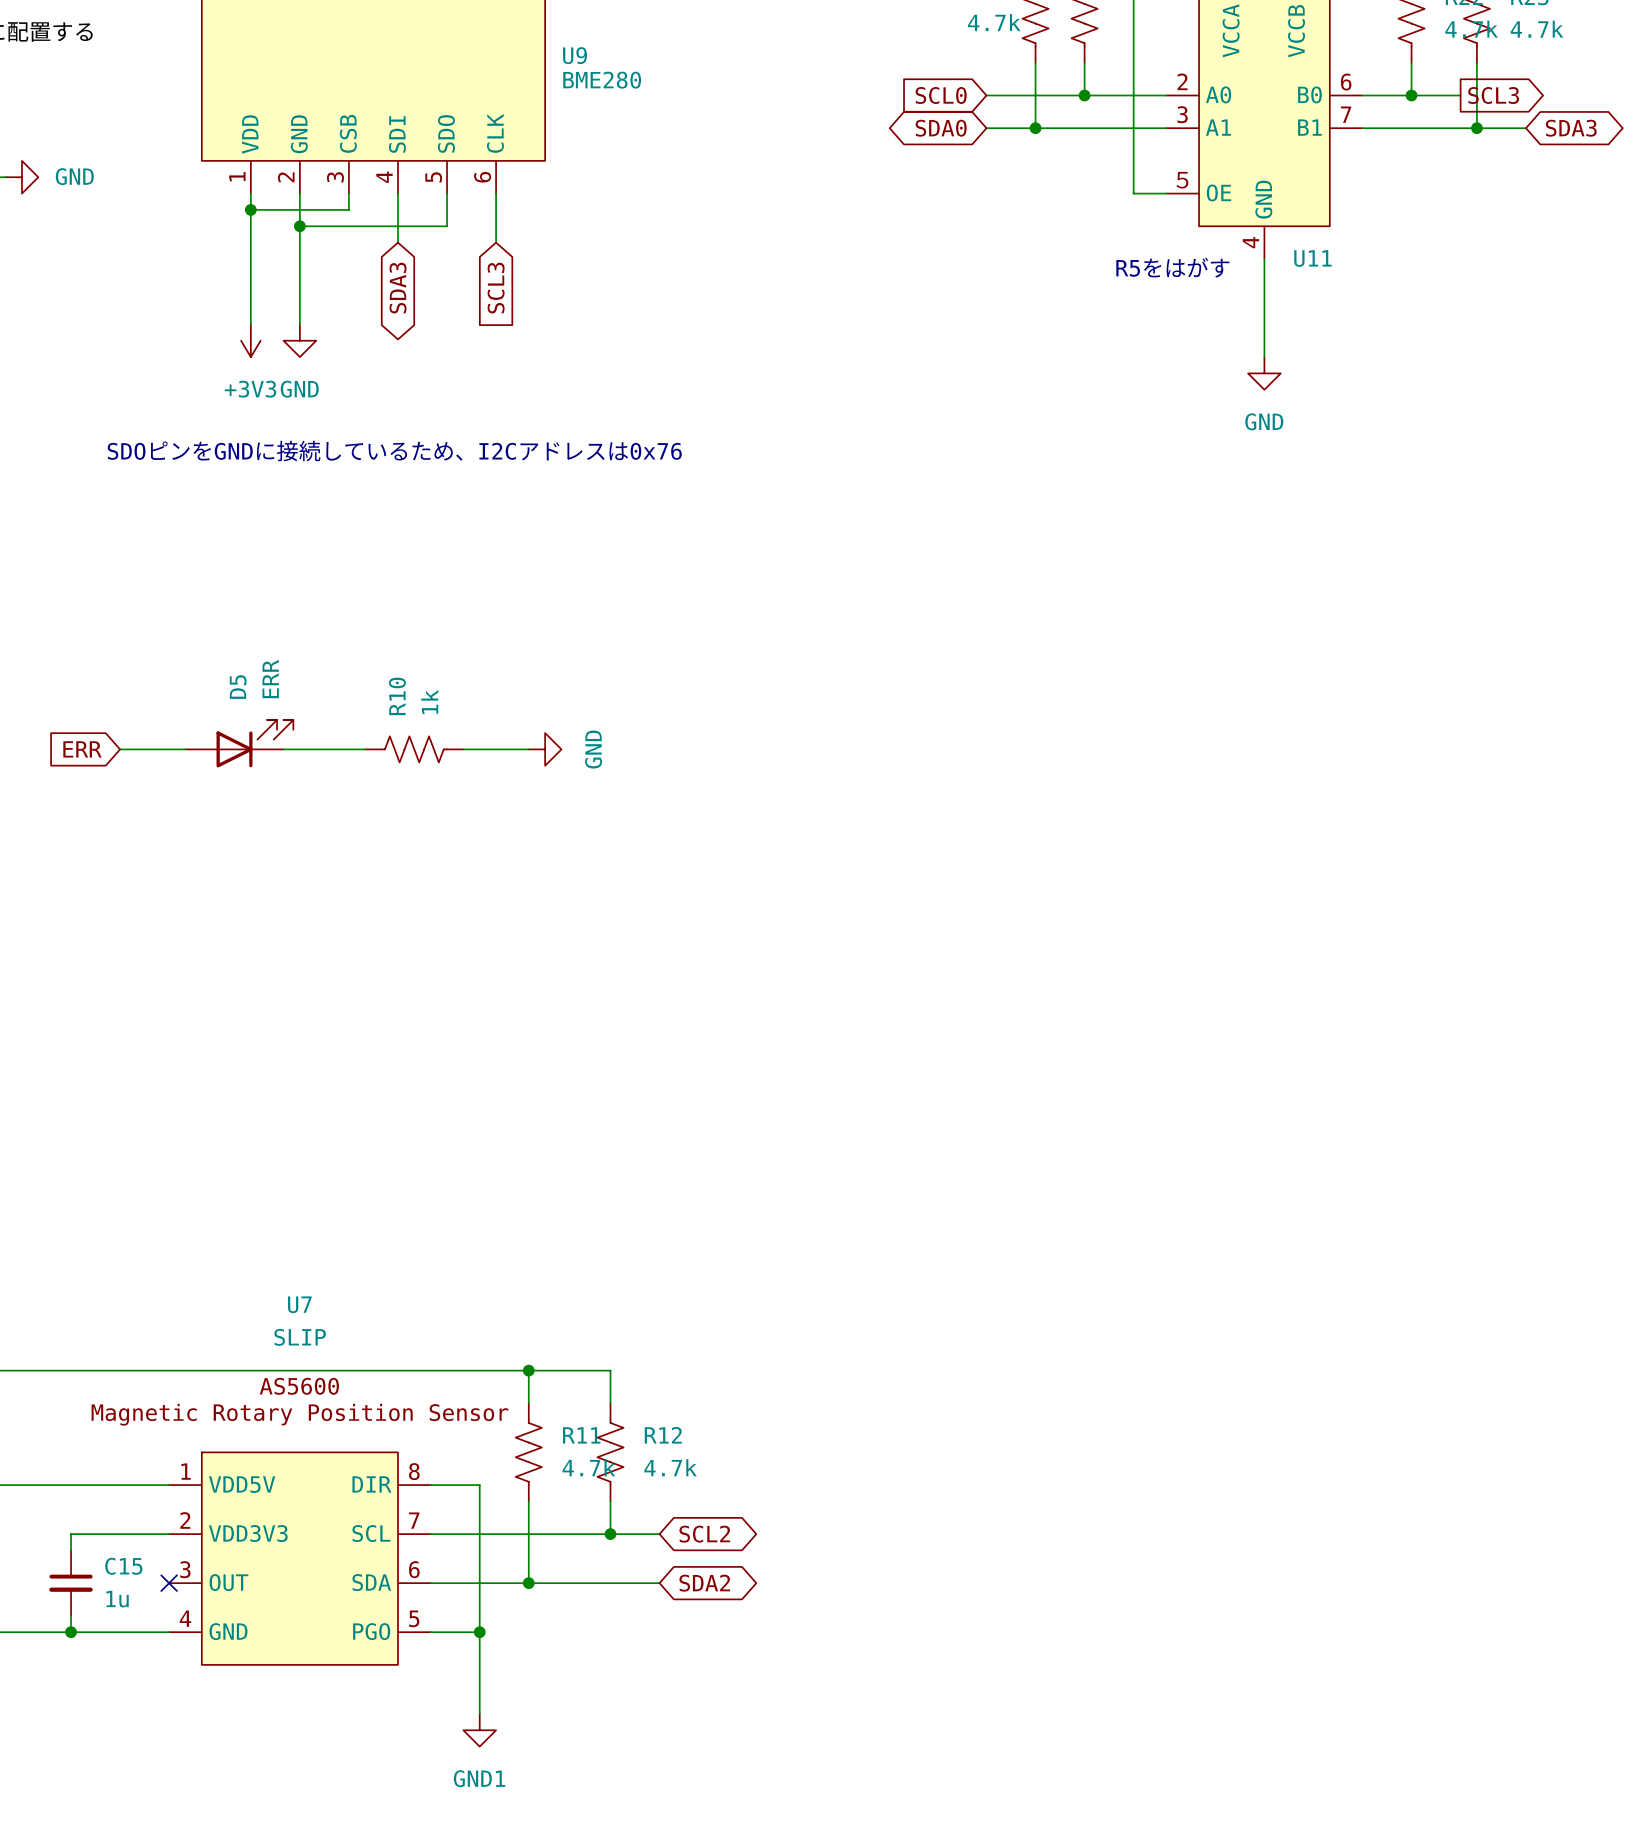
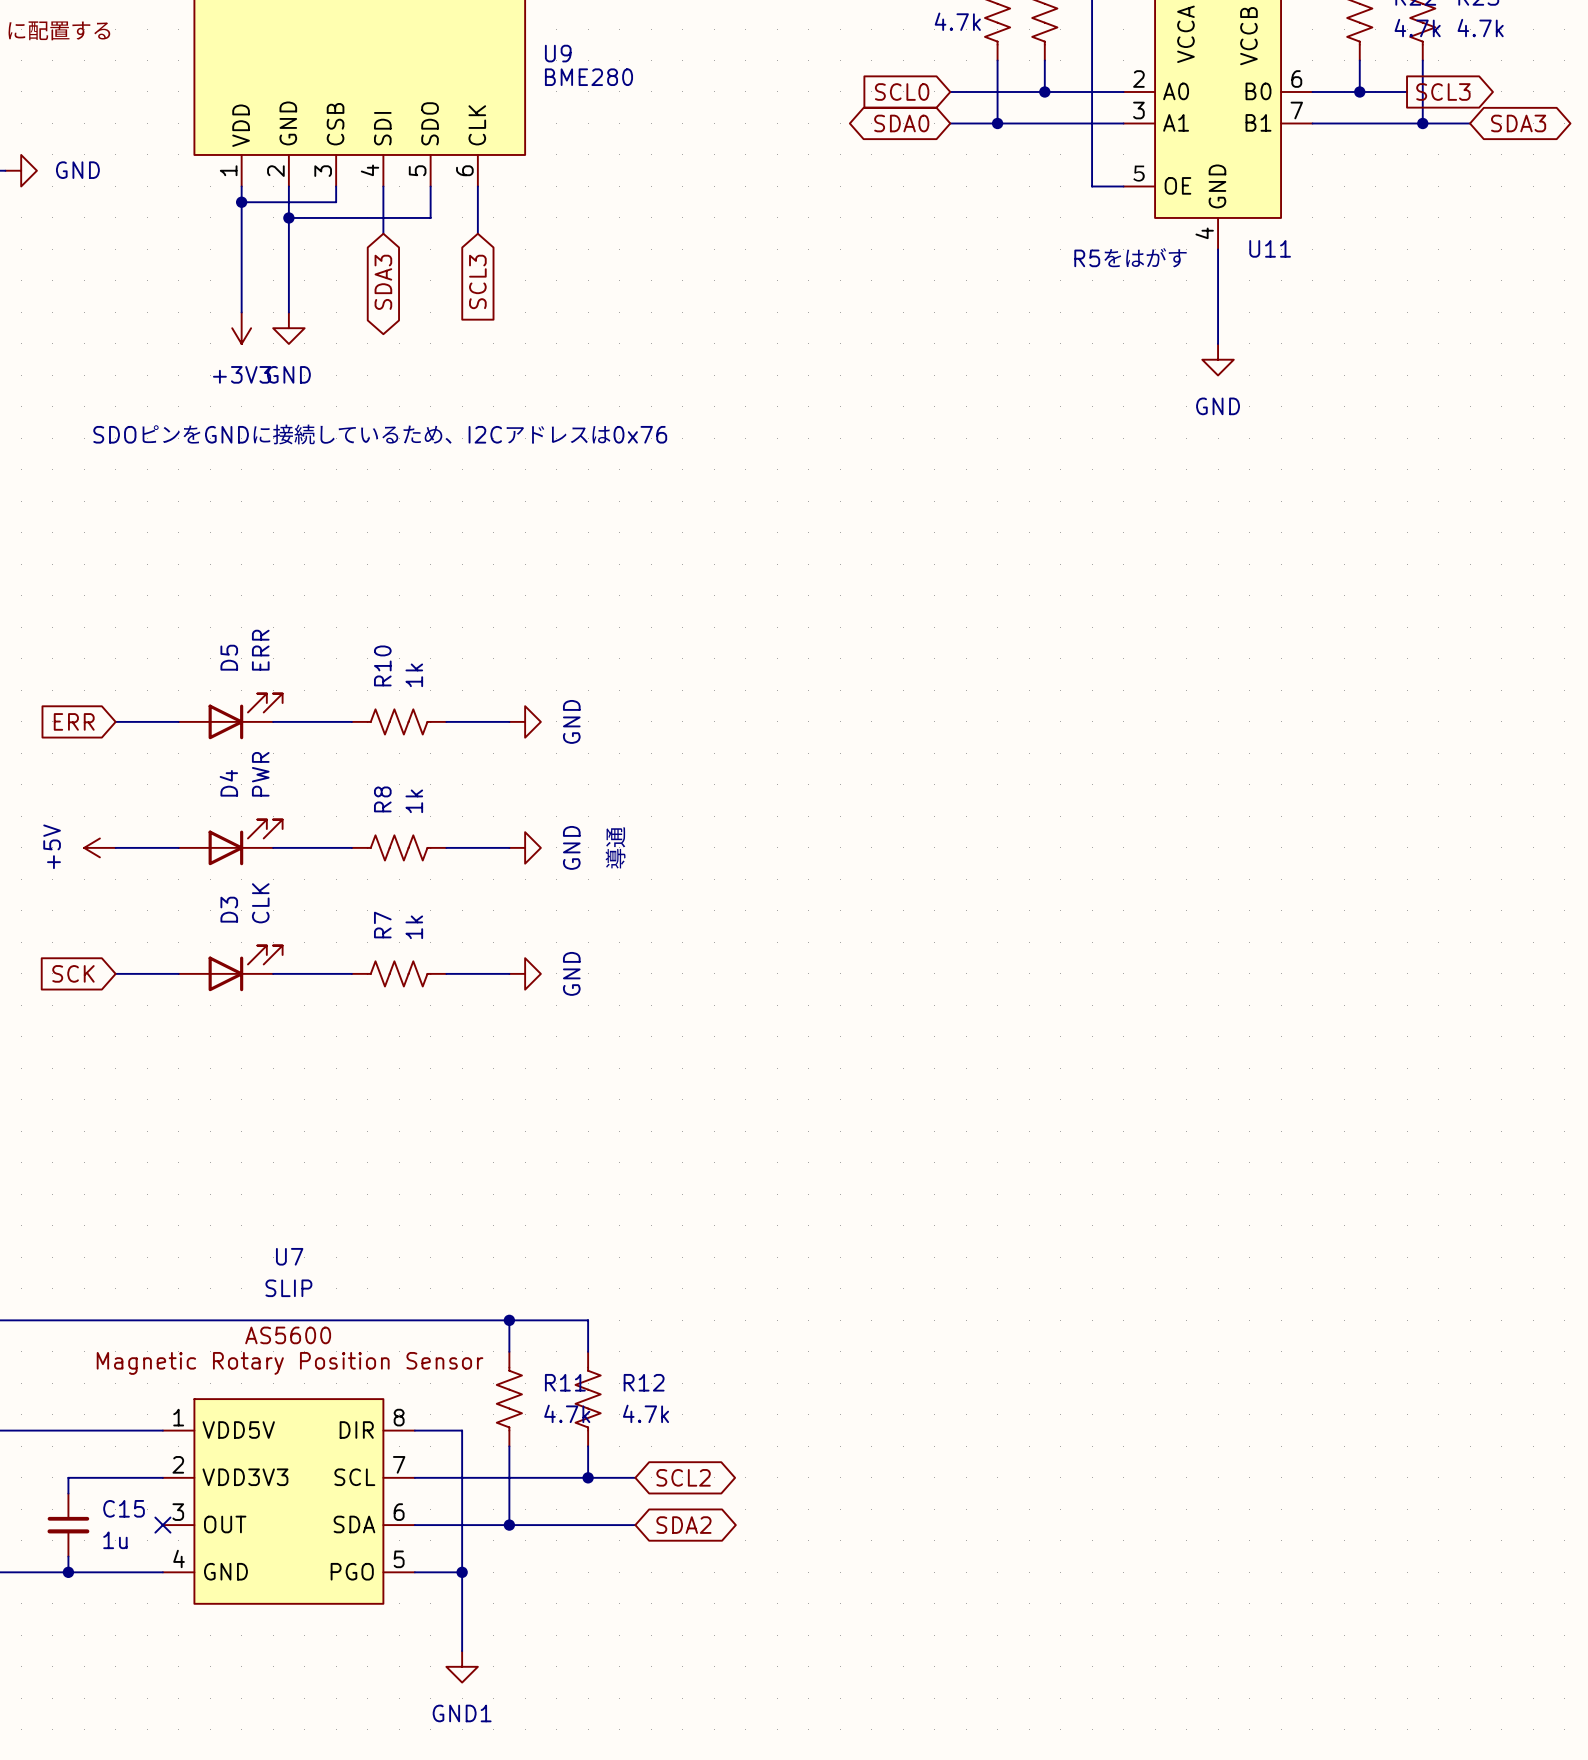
D4: none -> PWR (230, 842)
power symbol: none -> +5V (99, 847)
wire: none -> (115, 847) (178, 847)
wire: none -> (273, 847) (351, 847)
R8: none -> 1k (399, 847)
wire: none -> (446, 847) (509, 847)
power symbol: none -> GND (525, 847)
text: none -> 導通 (615, 847)
D3: none -> CLK (230, 968)
global label: none -> SCK (73, 973)
wire: none -> (115, 973) (178, 973)
wire: none -> (273, 973) (351, 973)
R7: none -> 1k (399, 973)
wire: none -> (446, 973) (509, 973)
power symbol: none -> GND (525, 973)

